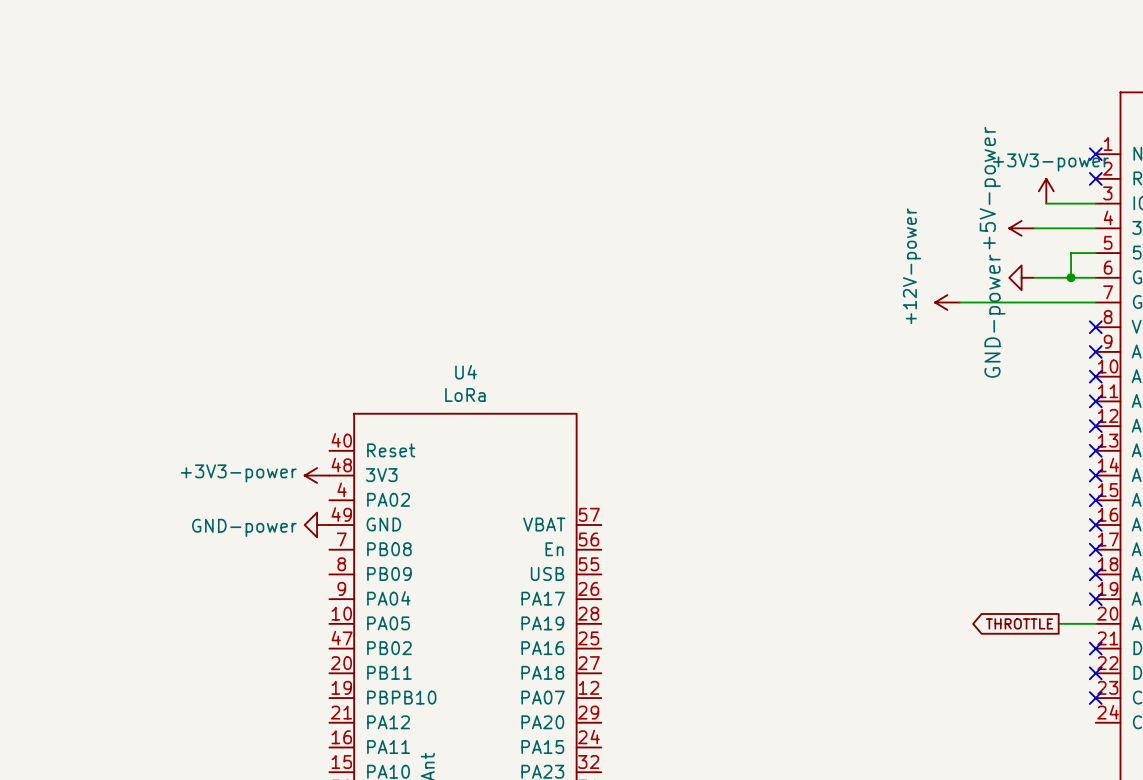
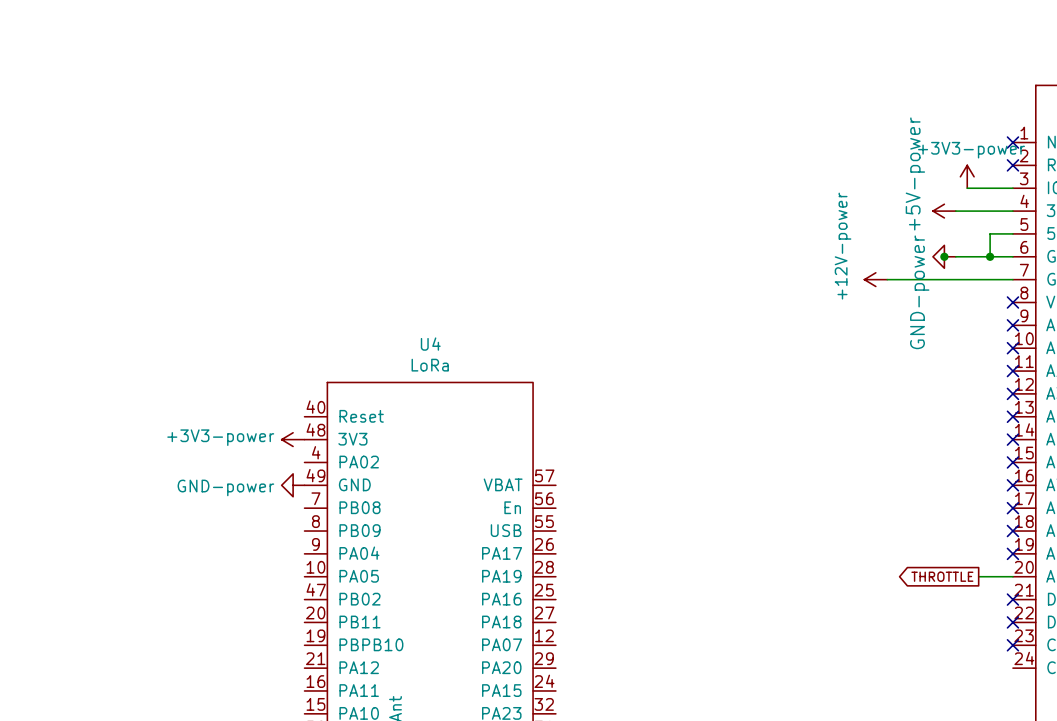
junction: none -> (944, 256)

